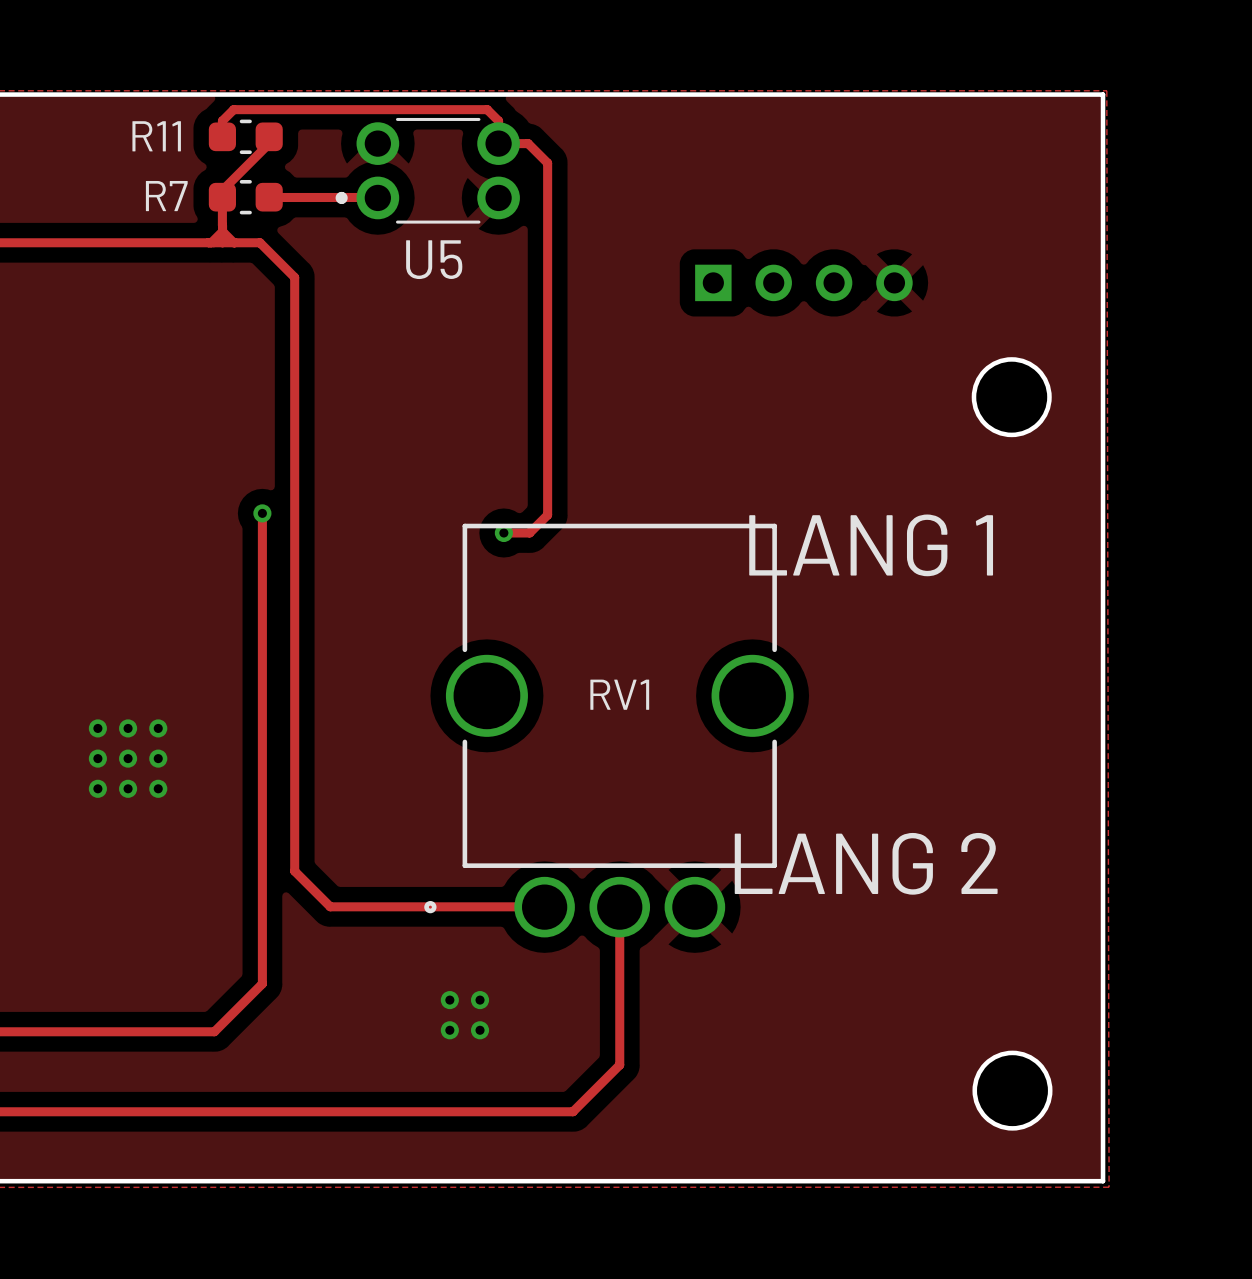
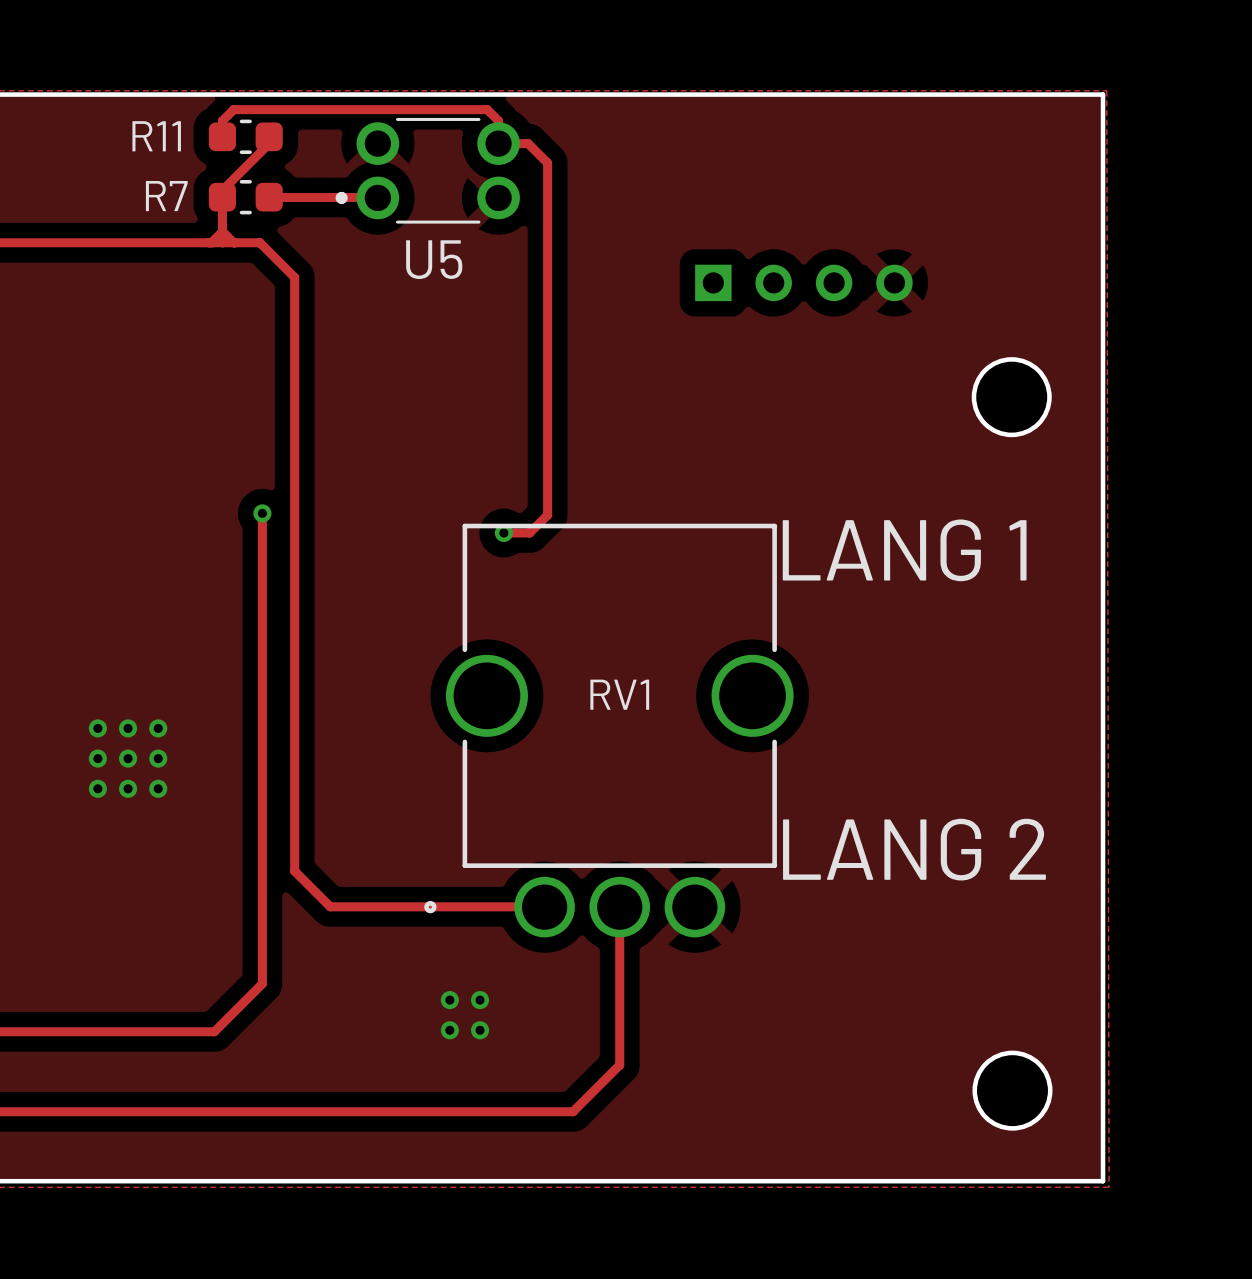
text position: LANG 1 (871, 545) -> LANG 1 (904, 550)
text position: LANG 2 (866, 863) -> LANG 2 (914, 849)

